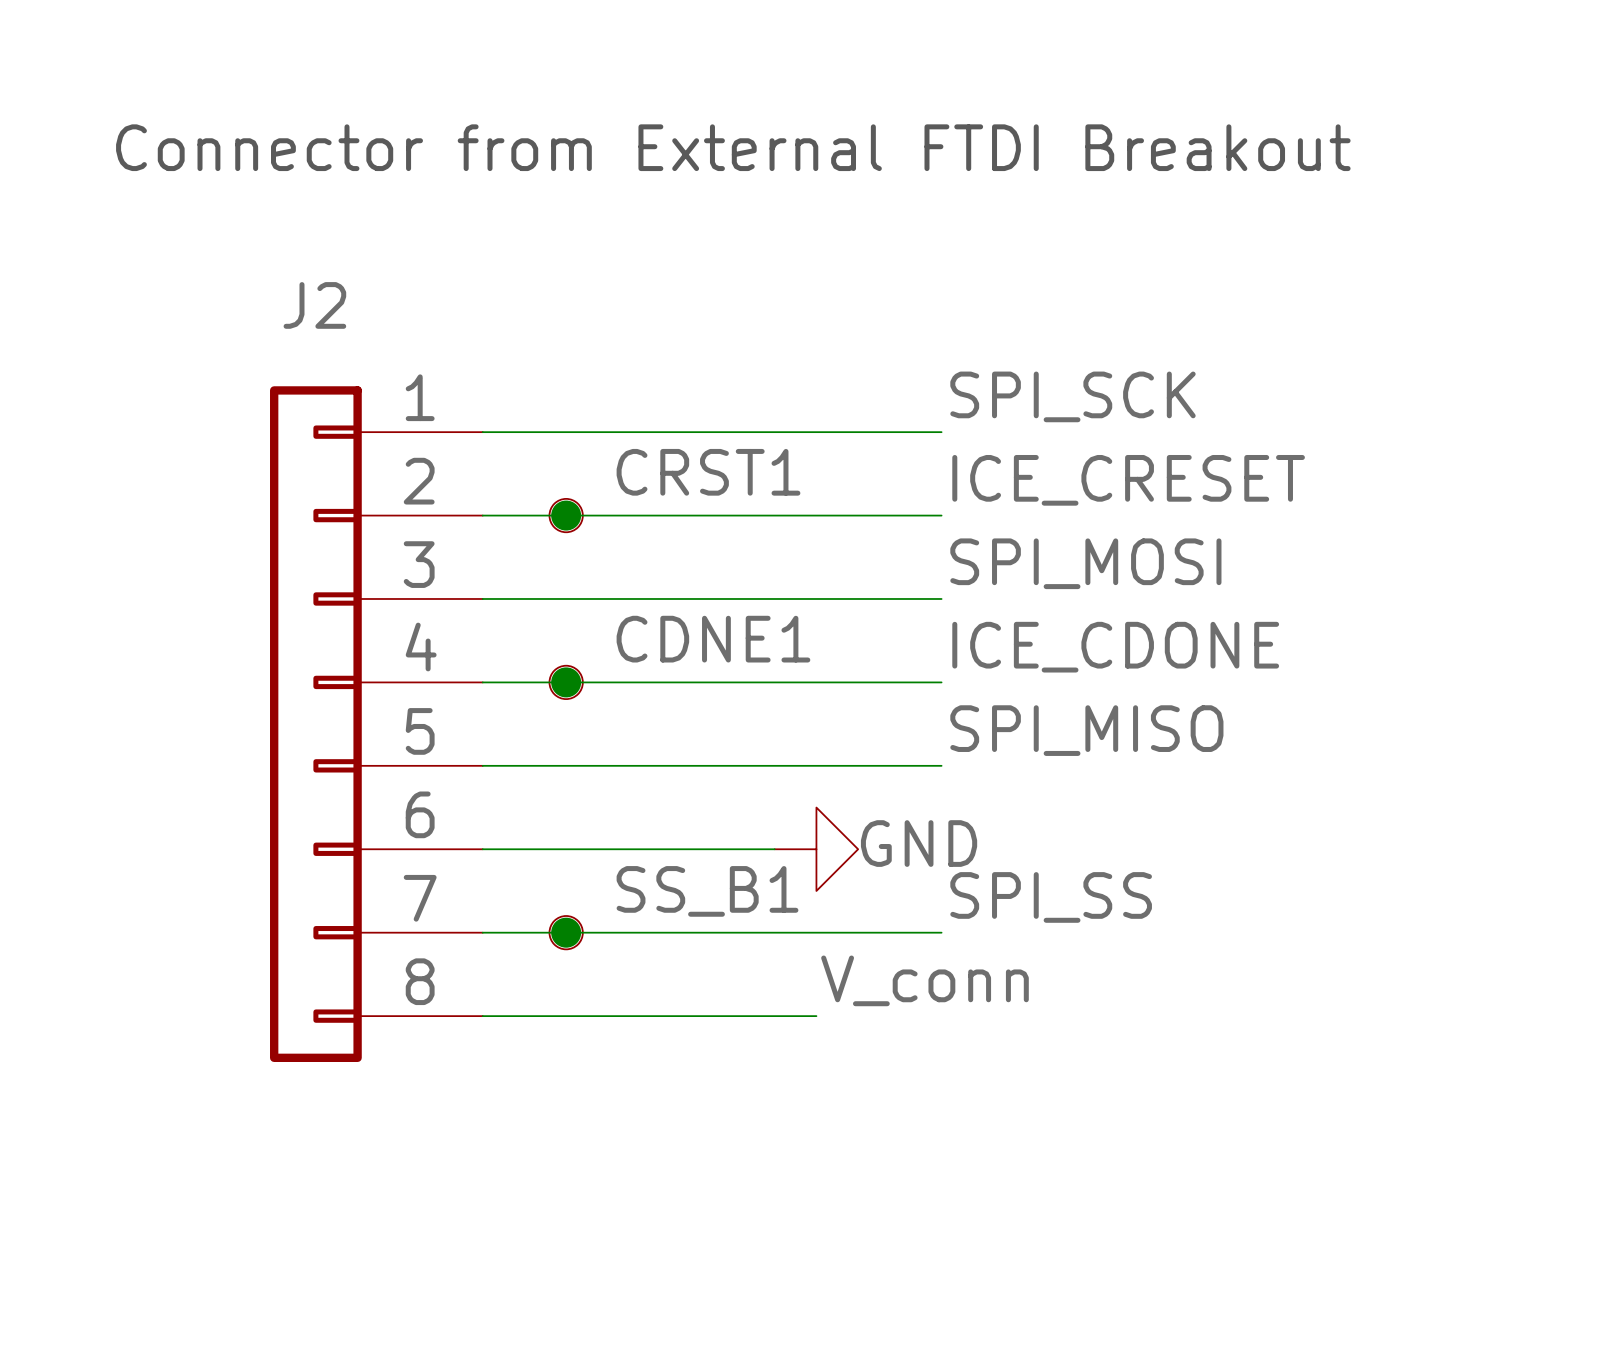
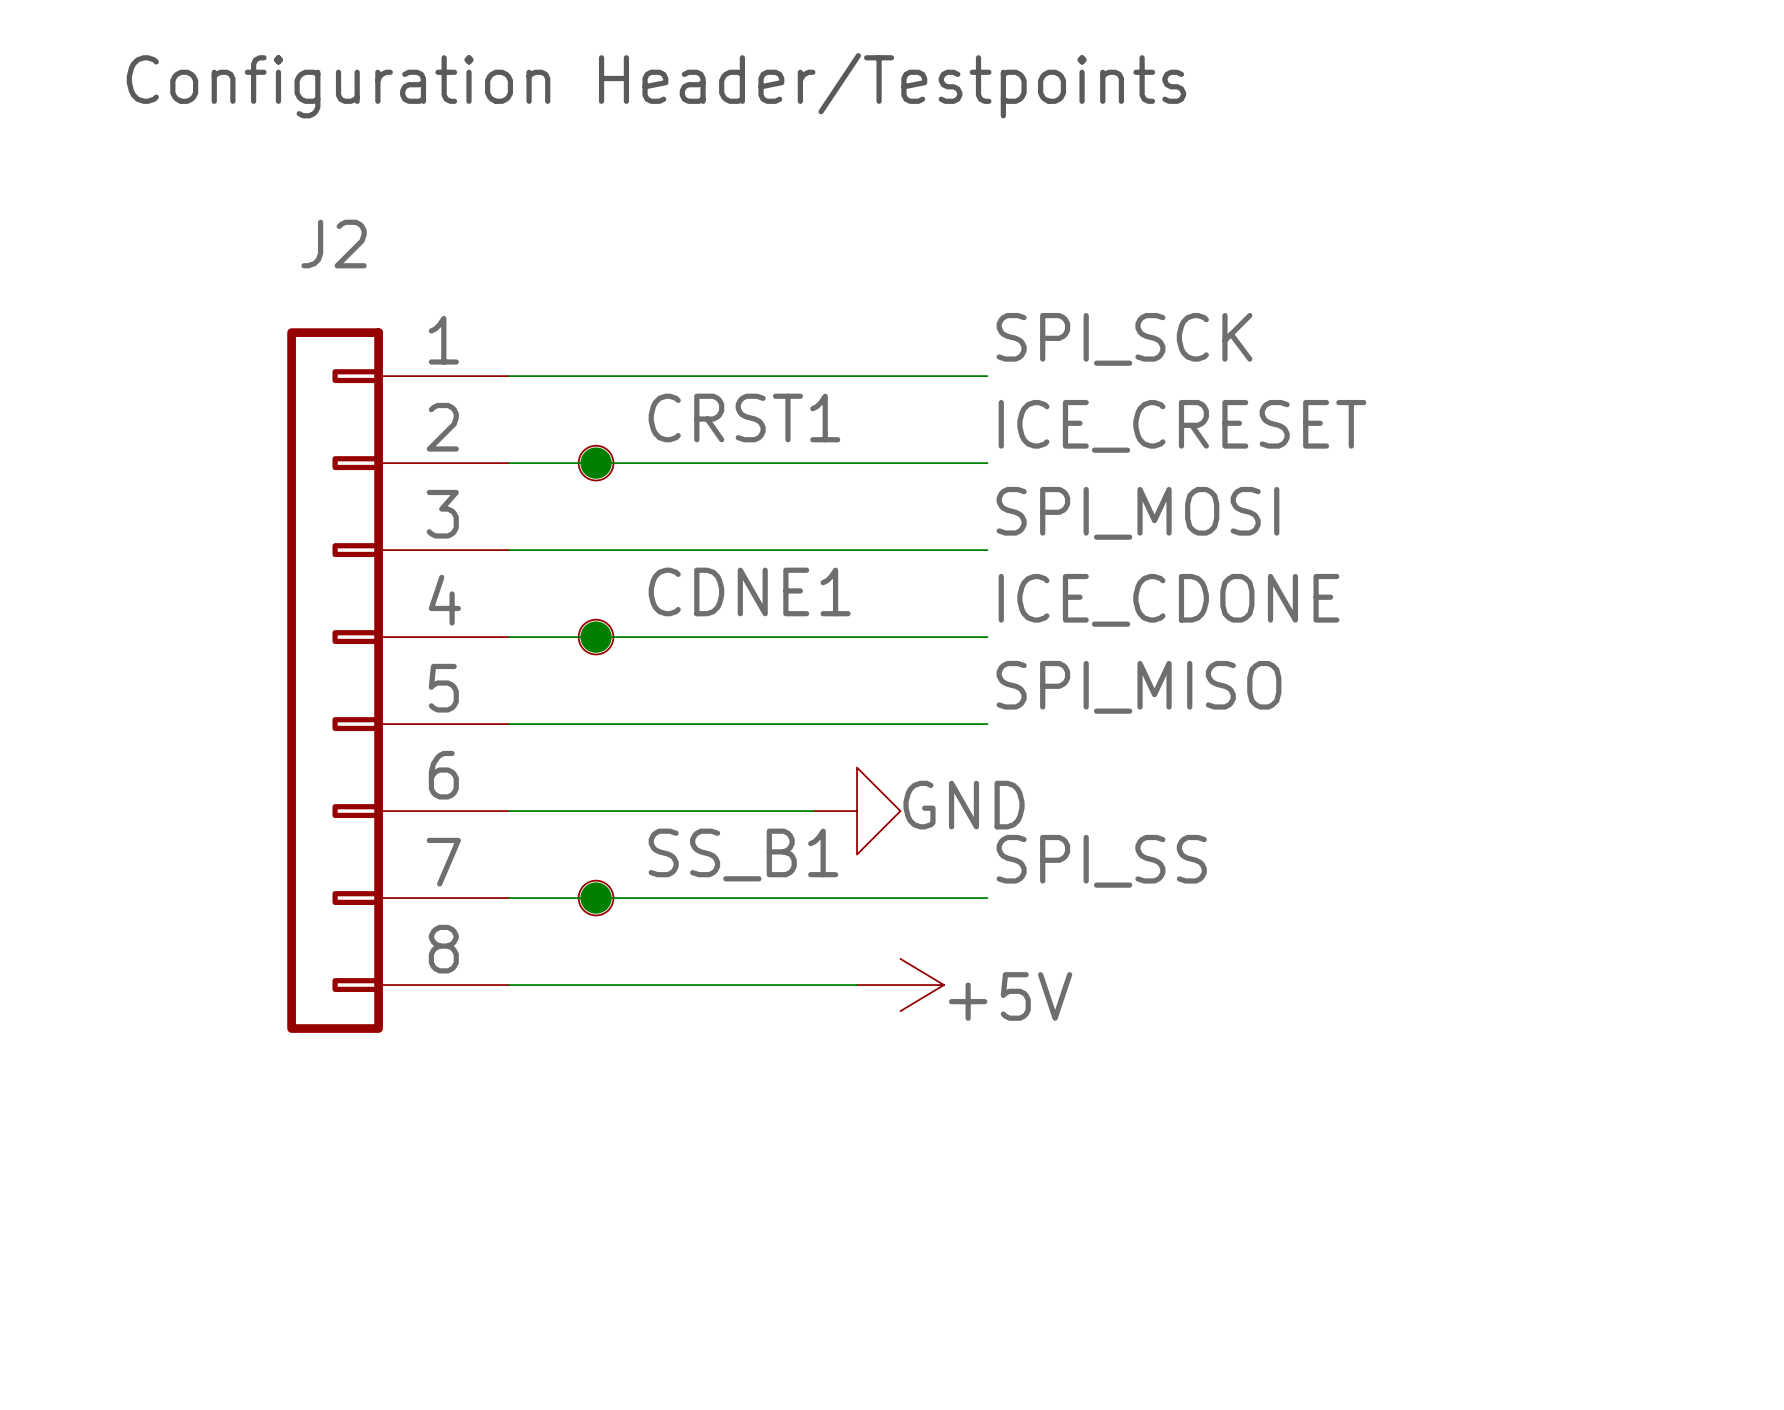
text: Connector from External FTDI Breakout (733, 147) -> Configuration Header/Testpoints (656, 85)
label: V_conn (925, 980) -> none
power symbol: none -> +5V (900, 985)

